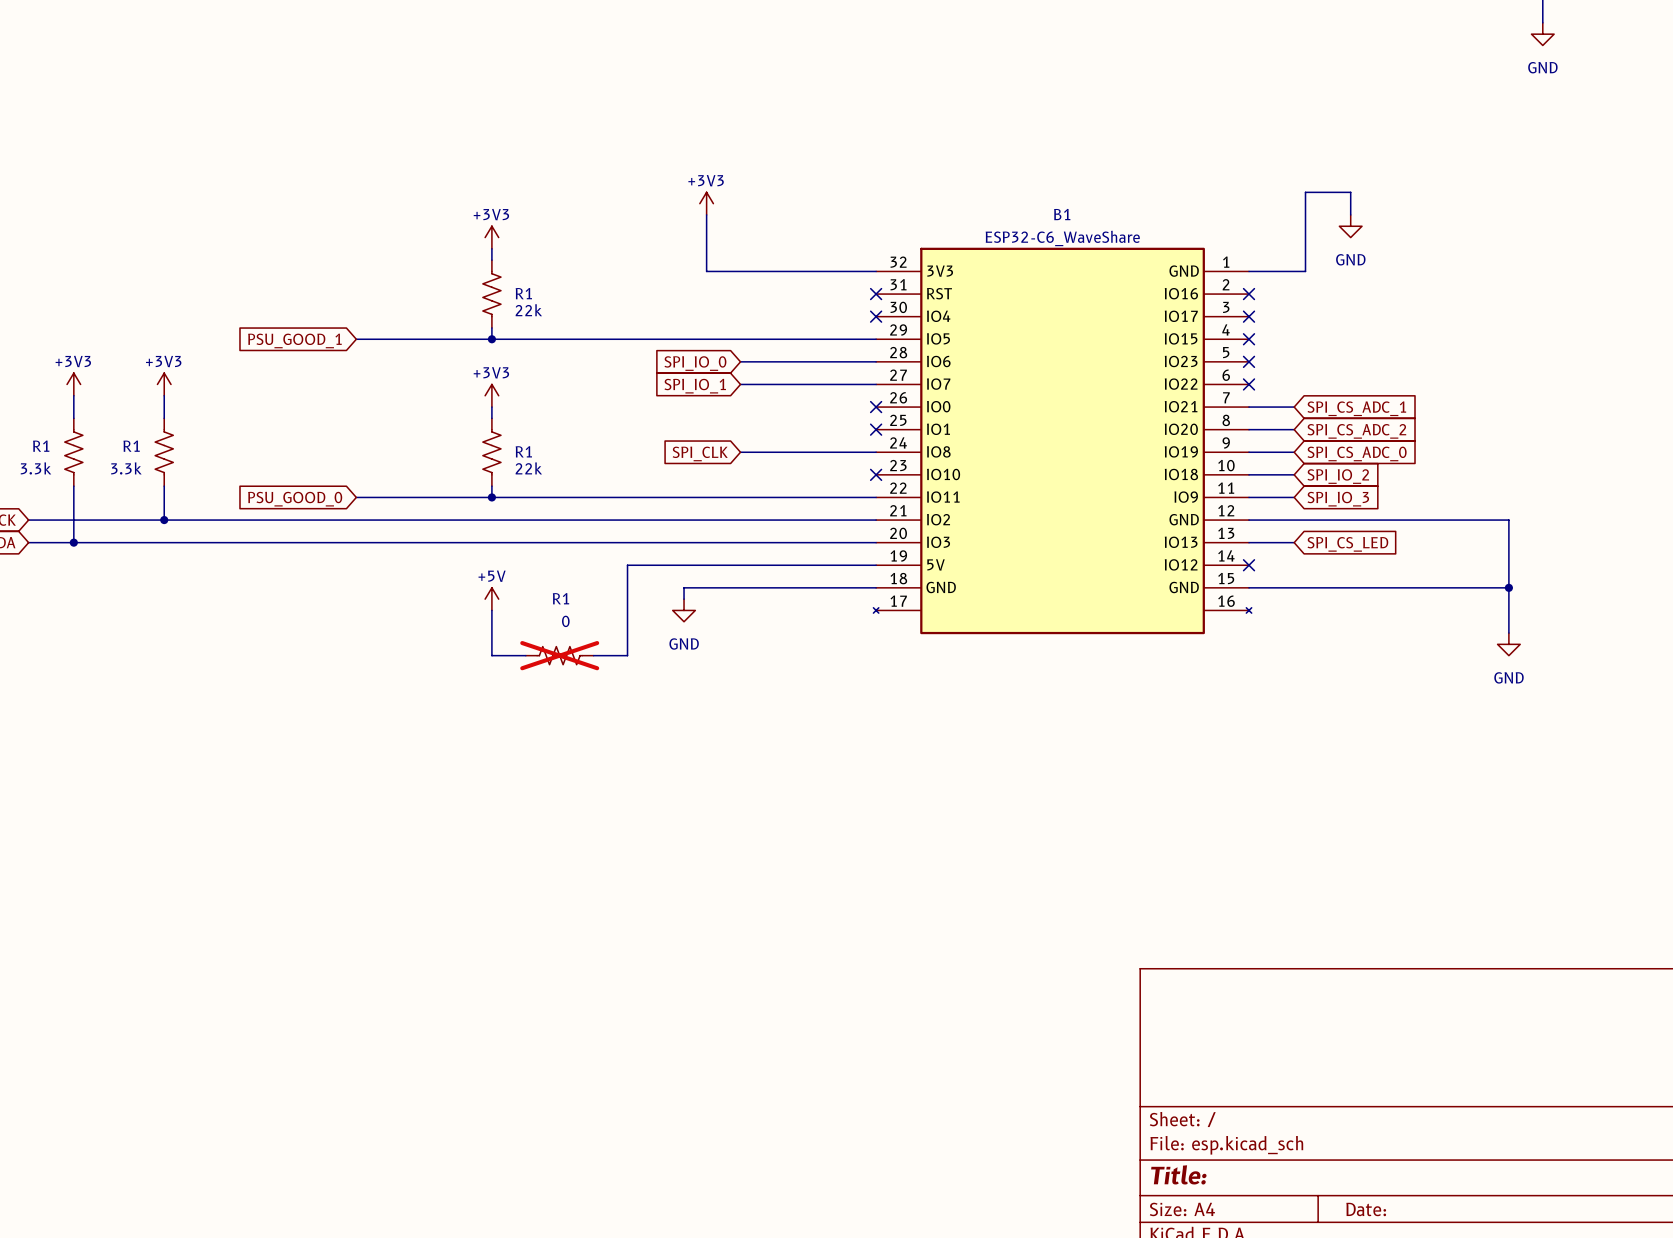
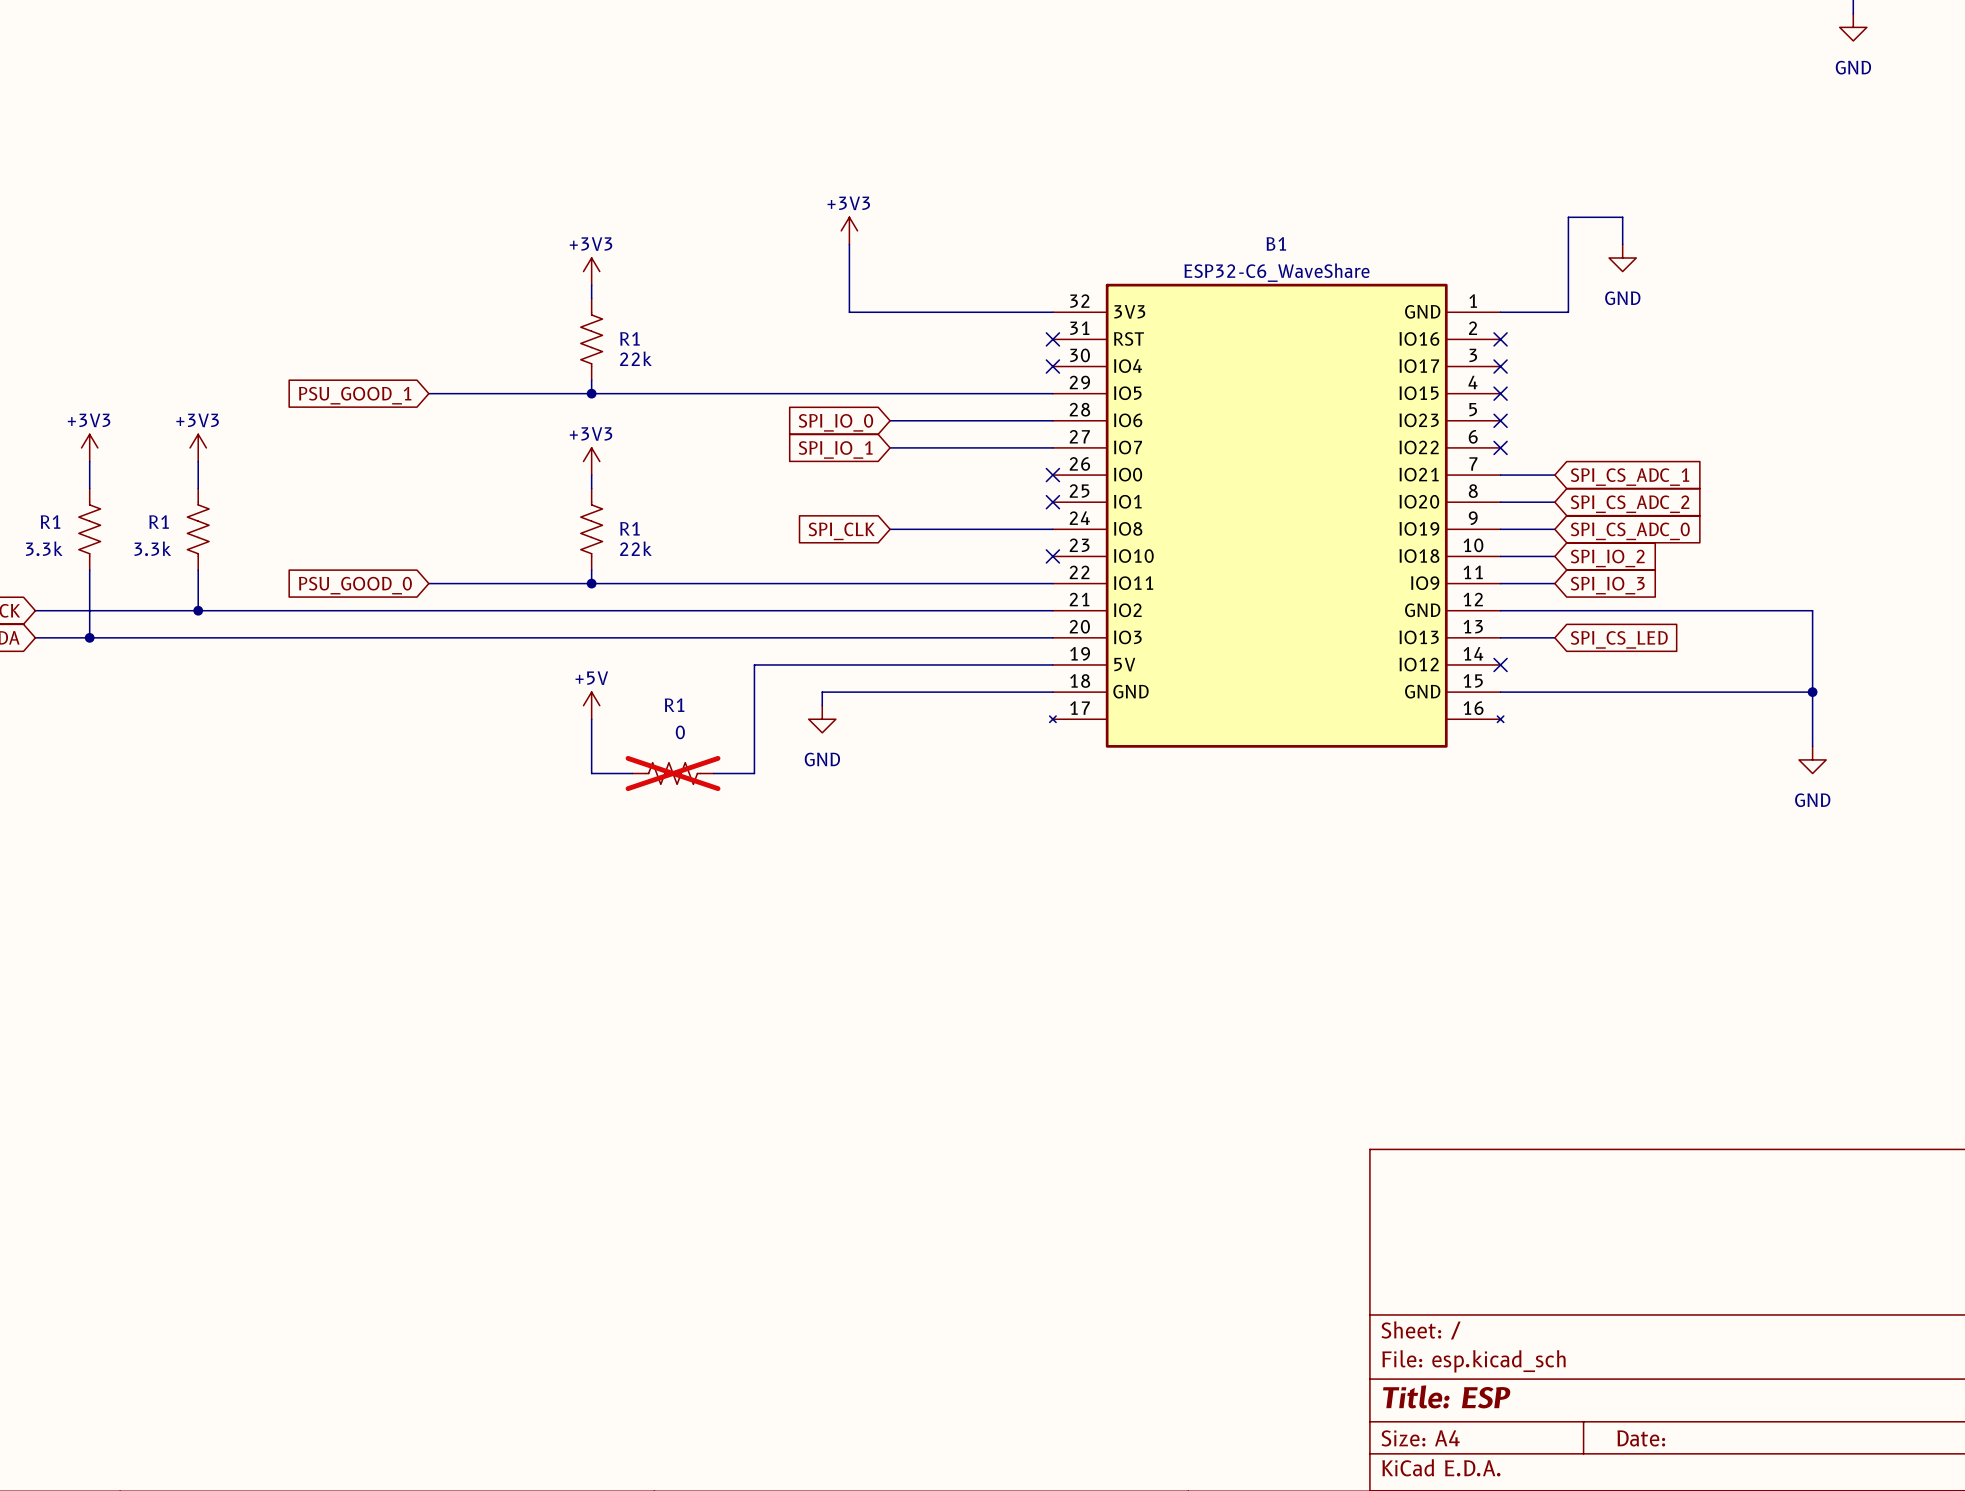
title block: Title: (1178, 1174) -> Title: ESP (1446, 1396)

